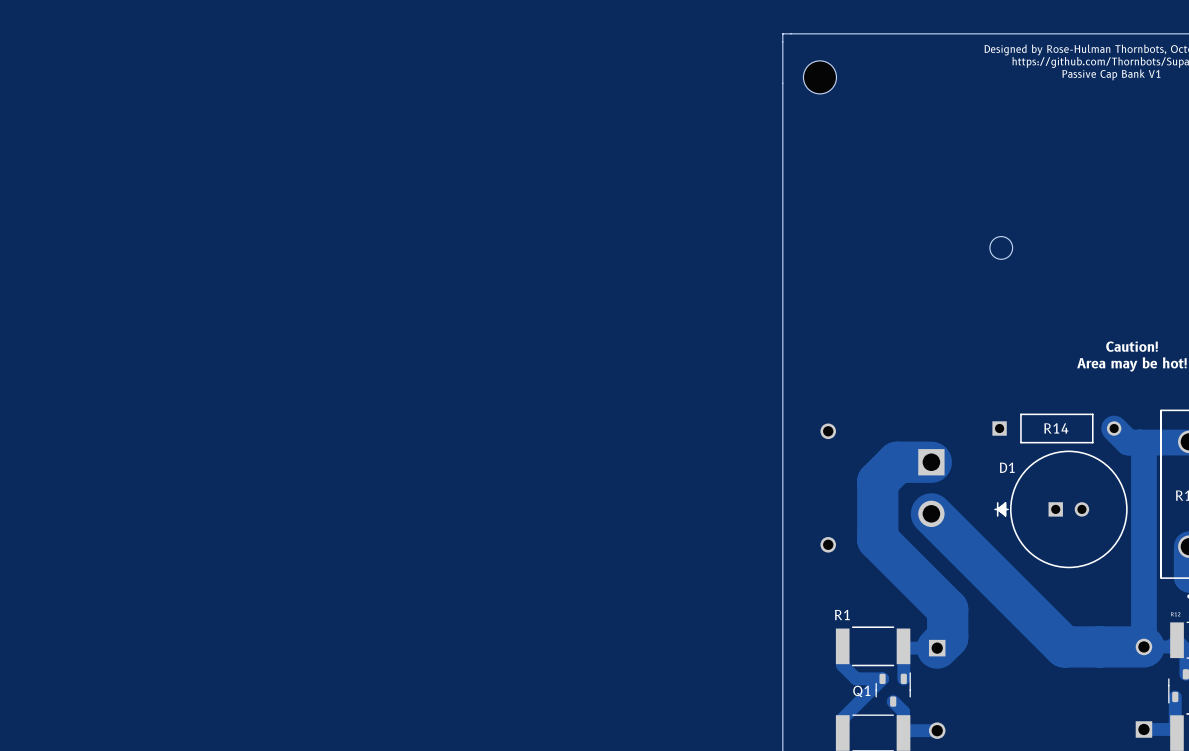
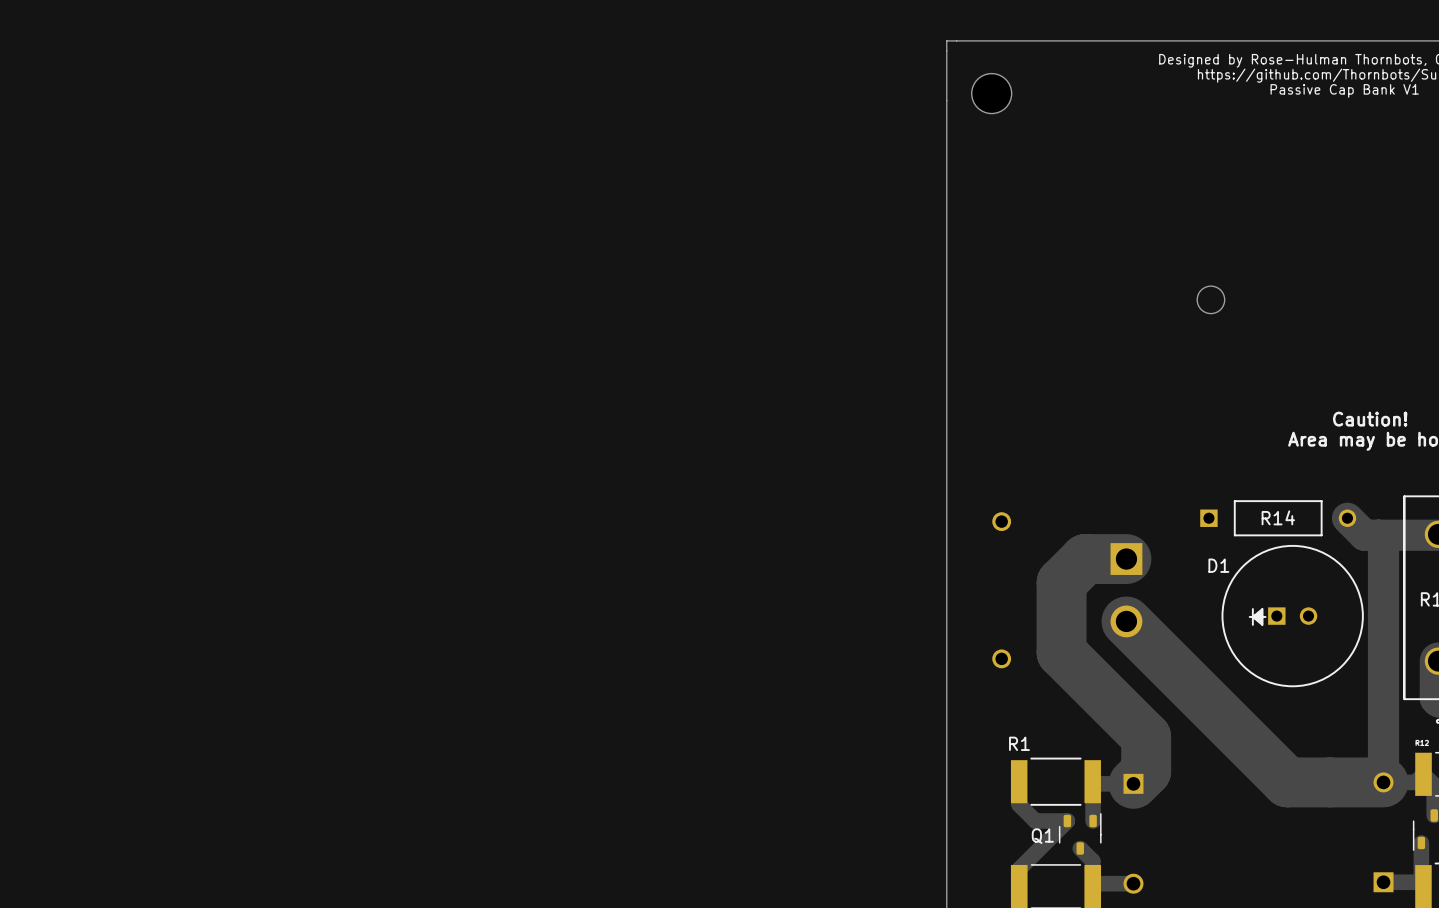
D1 footprint: [994, 450, 1128, 569] -> [1221, 544, 1364, 688]

